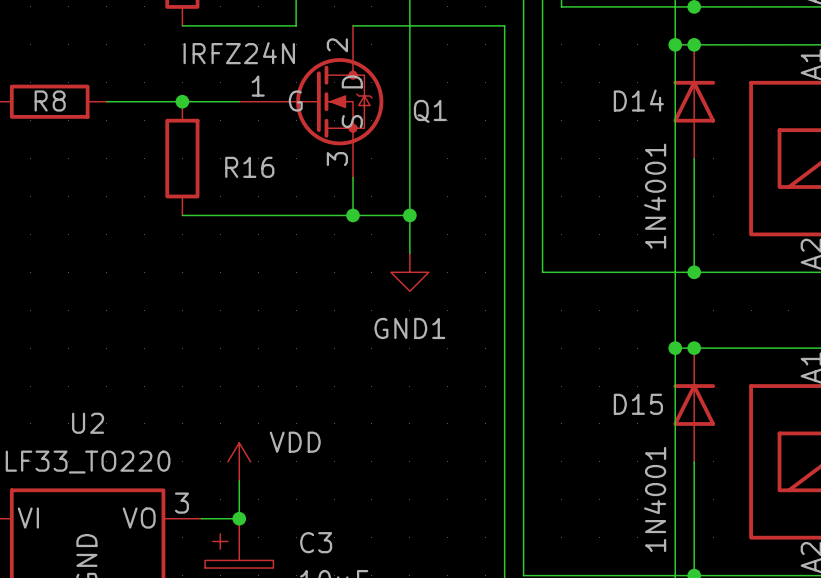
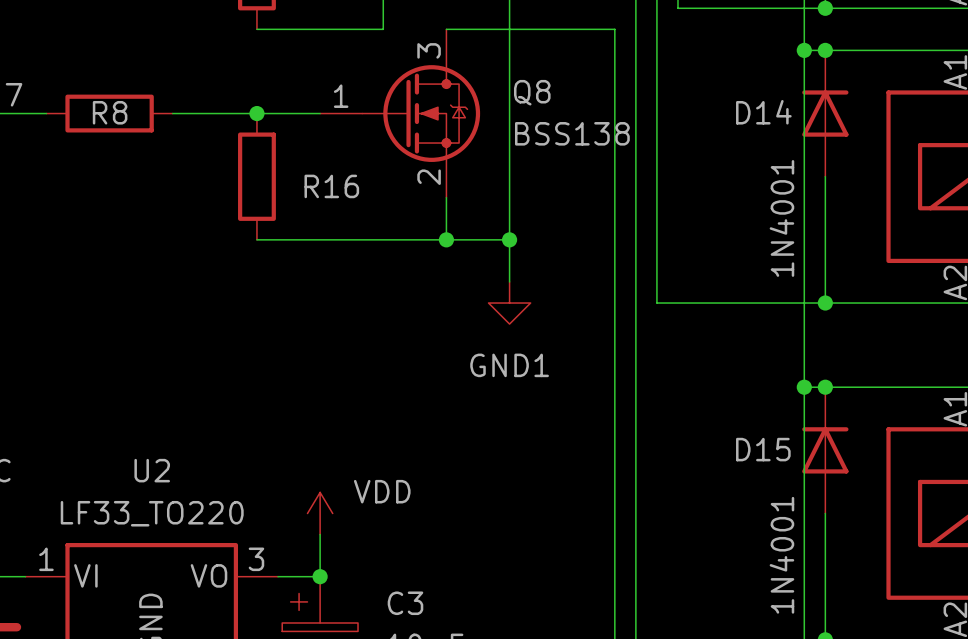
Q1 pin number: 2 (337, 45) -> 3 (429, 50)
Q1 value: IRFZ24N (239, 53) -> BSS138 (572, 133)
Q1 pin name: D (352, 81) -> none
Q1 pin name: G (295, 101) -> none
Q1 name: Q1 (430, 111) -> Q8 (532, 92)
Q1 pin name: S (352, 121) -> none
Q1 pin number: 3 (337, 159) -> 2 (429, 177)

